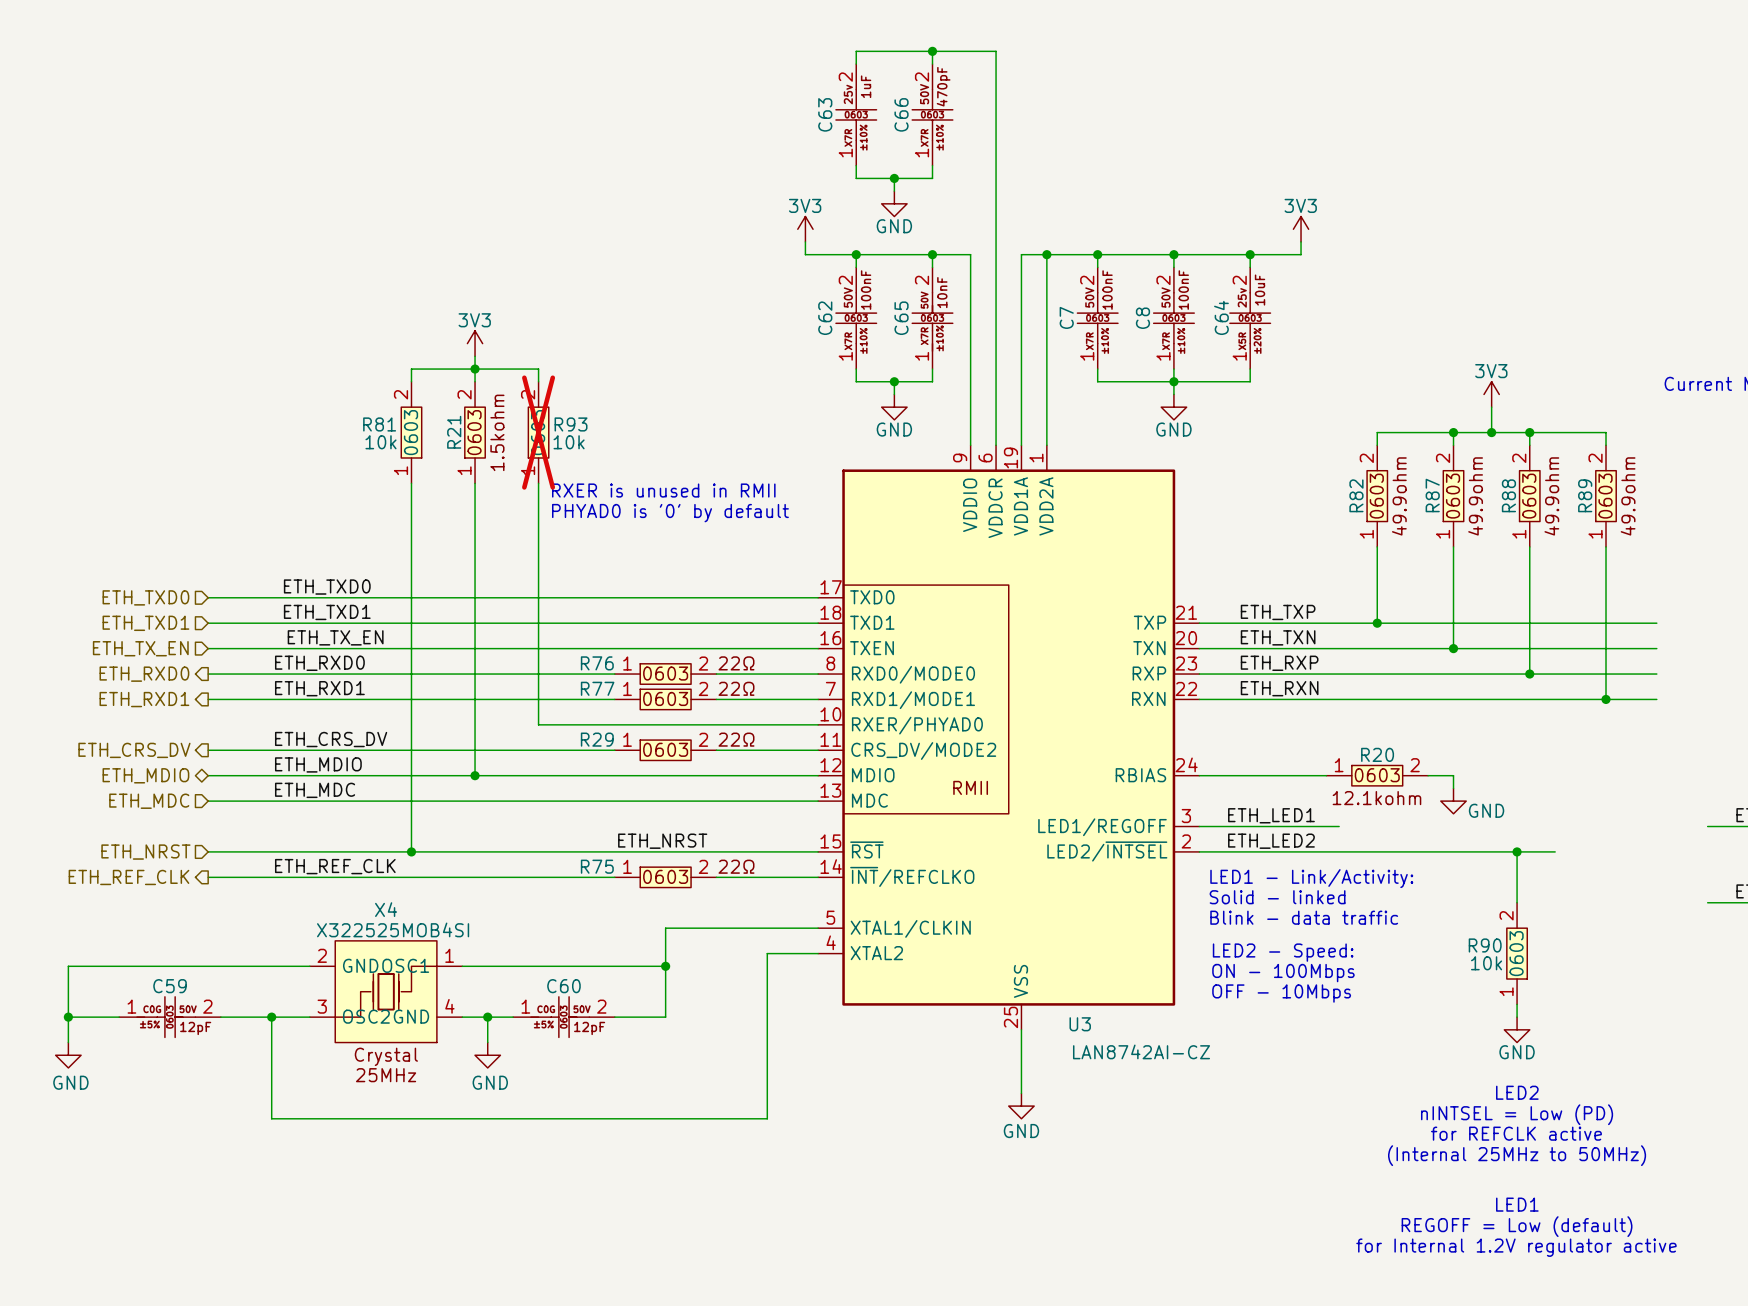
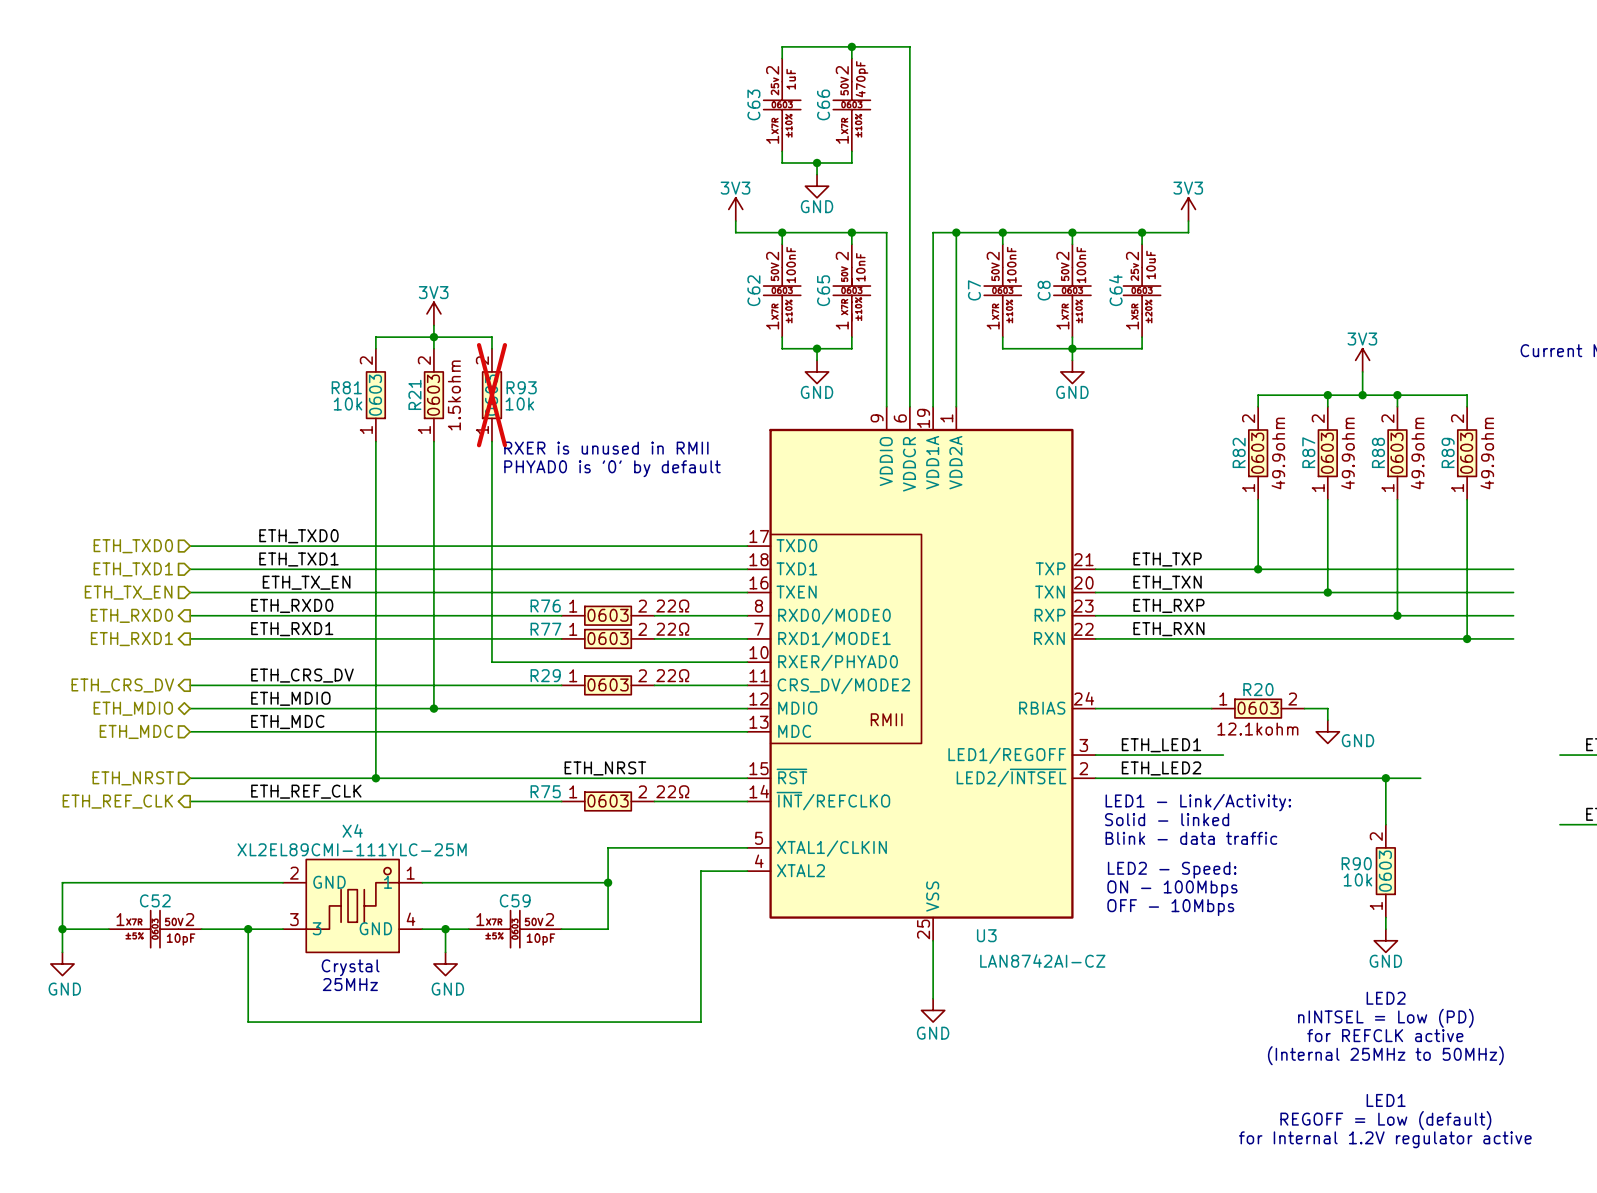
X4 value: X322525MOB4SI (393, 929) -> XL2EL89CMI-111YLC-25M (352, 849)
X4 symbol: [309, 940, 463, 1043] -> [283, 859, 423, 953]
C59 symbol: [119, 996, 221, 1038] -> [468, 910, 562, 948]
C52: none -> (155, 929)
C60: (563, 1017) -> none
text: none -> Crystal (350, 967)
text: none -> 25MHz (350, 984)

